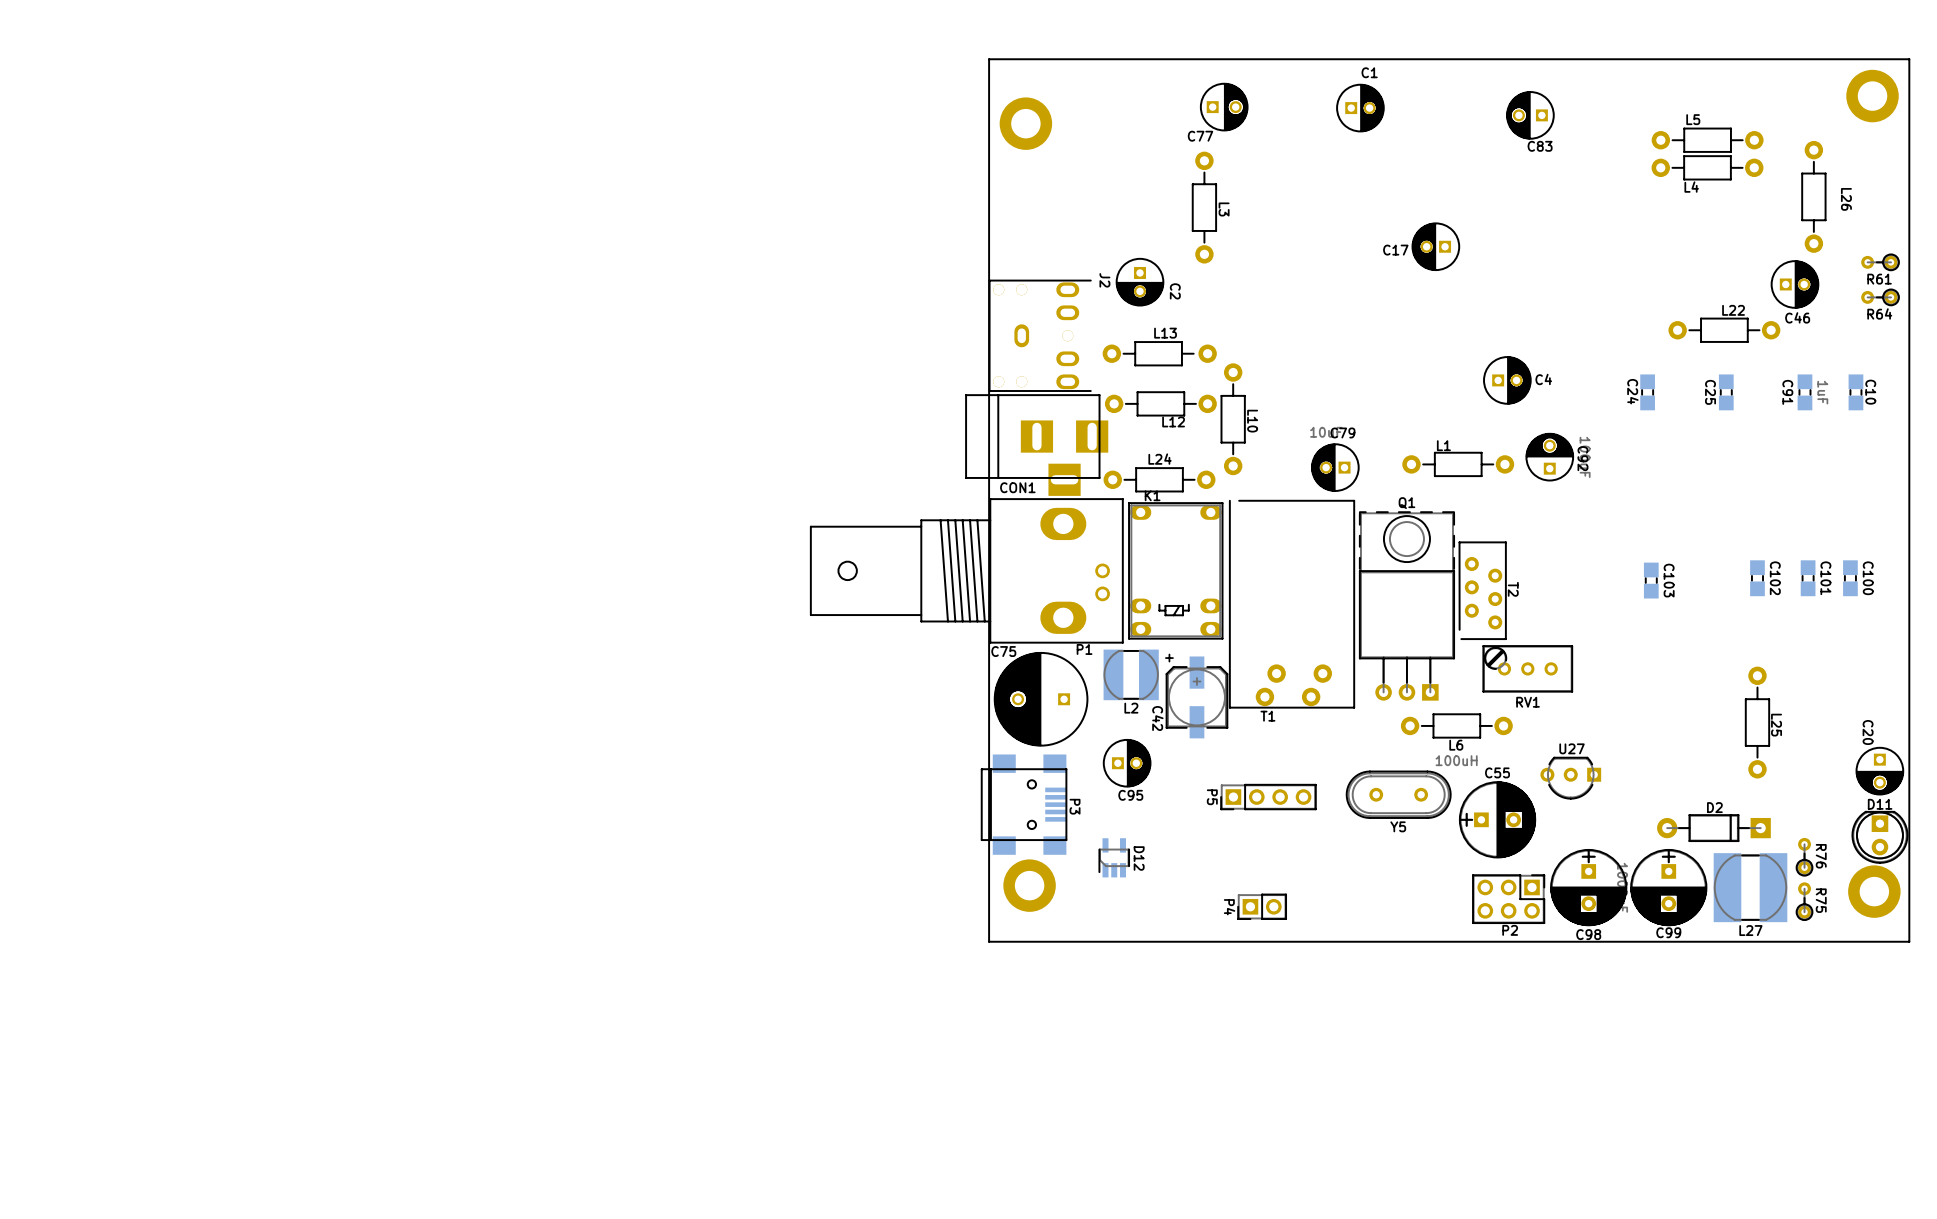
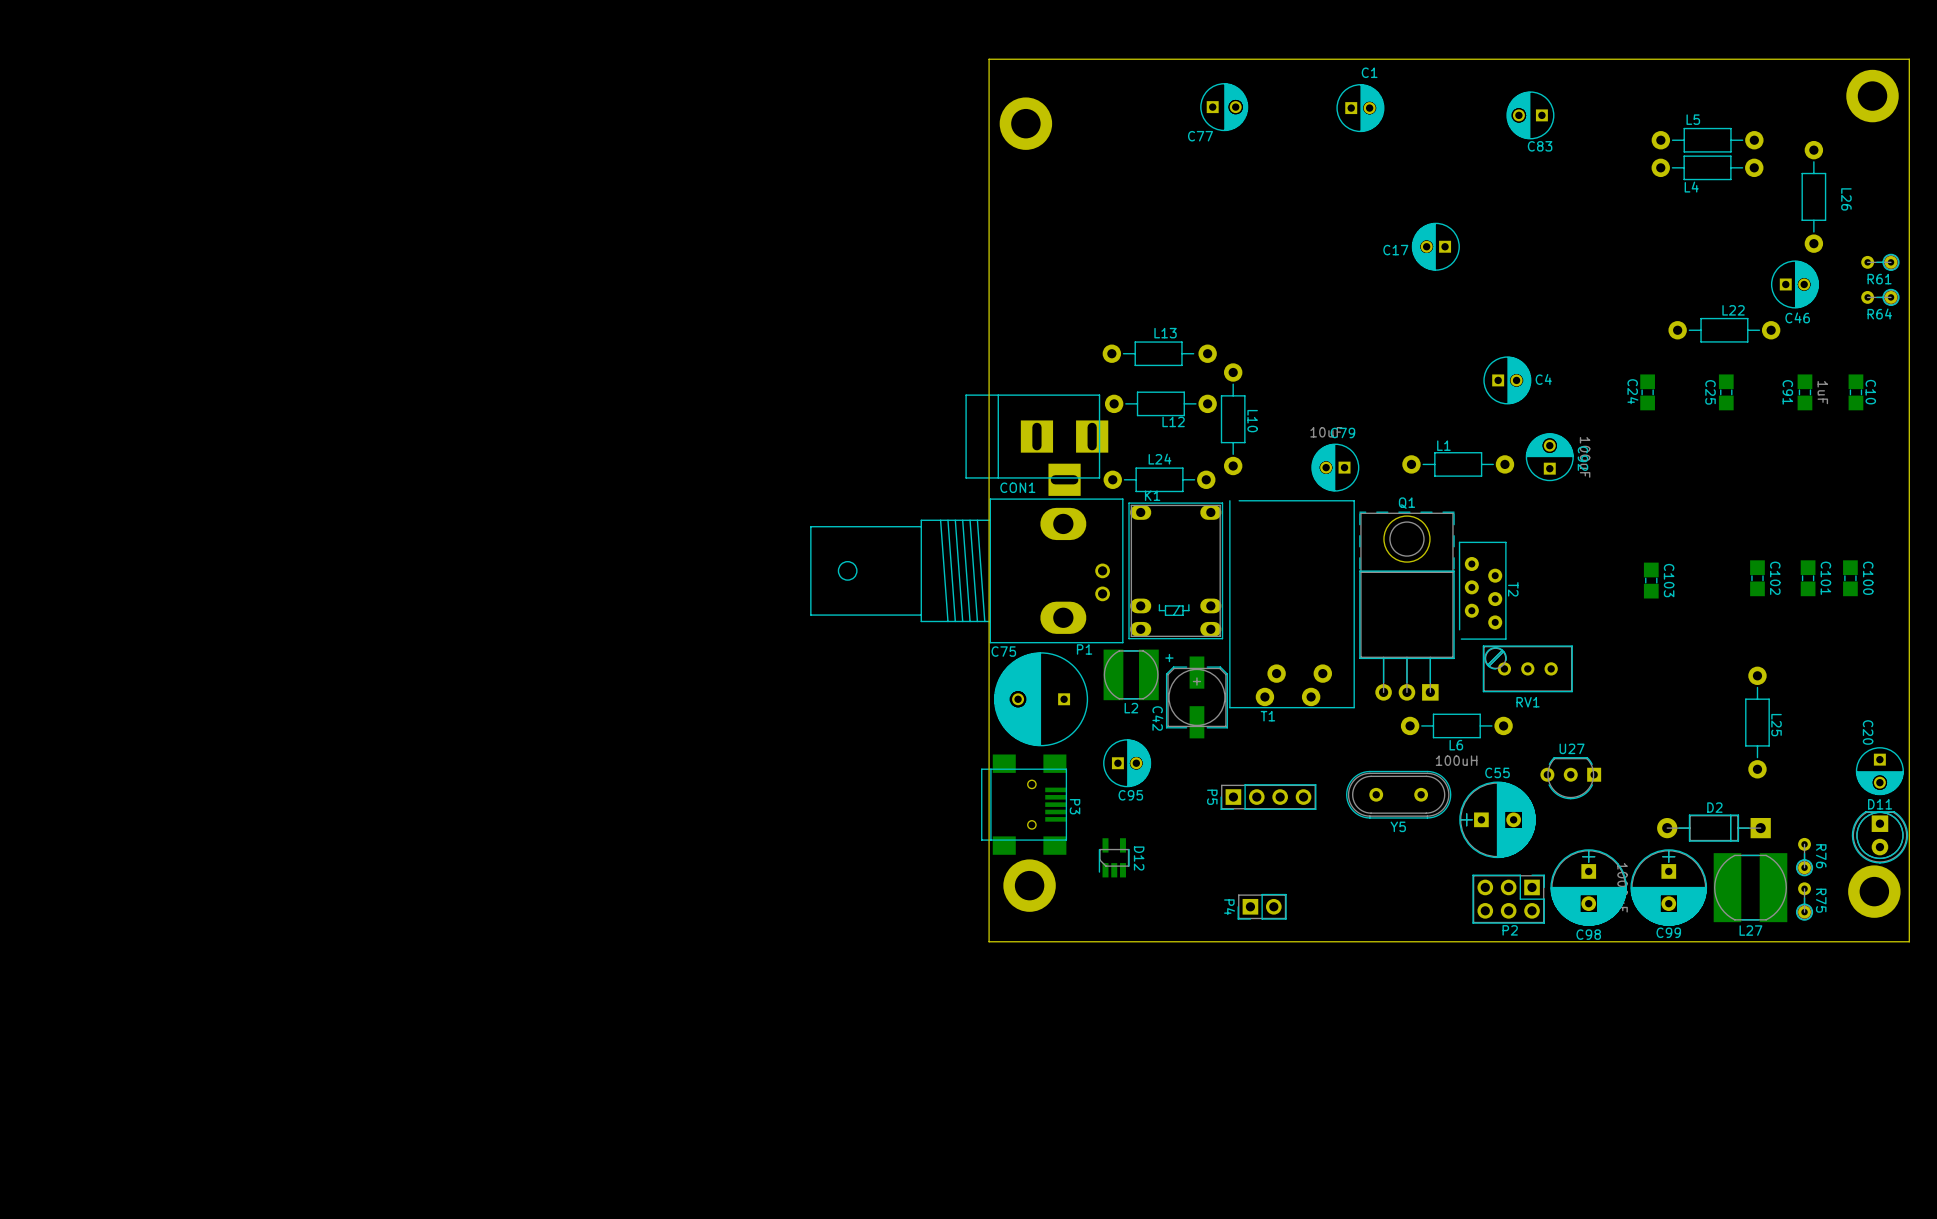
L3: (1204, 207) -> none
C2: (1140, 282) -> none
J2: (1040, 335) -> none

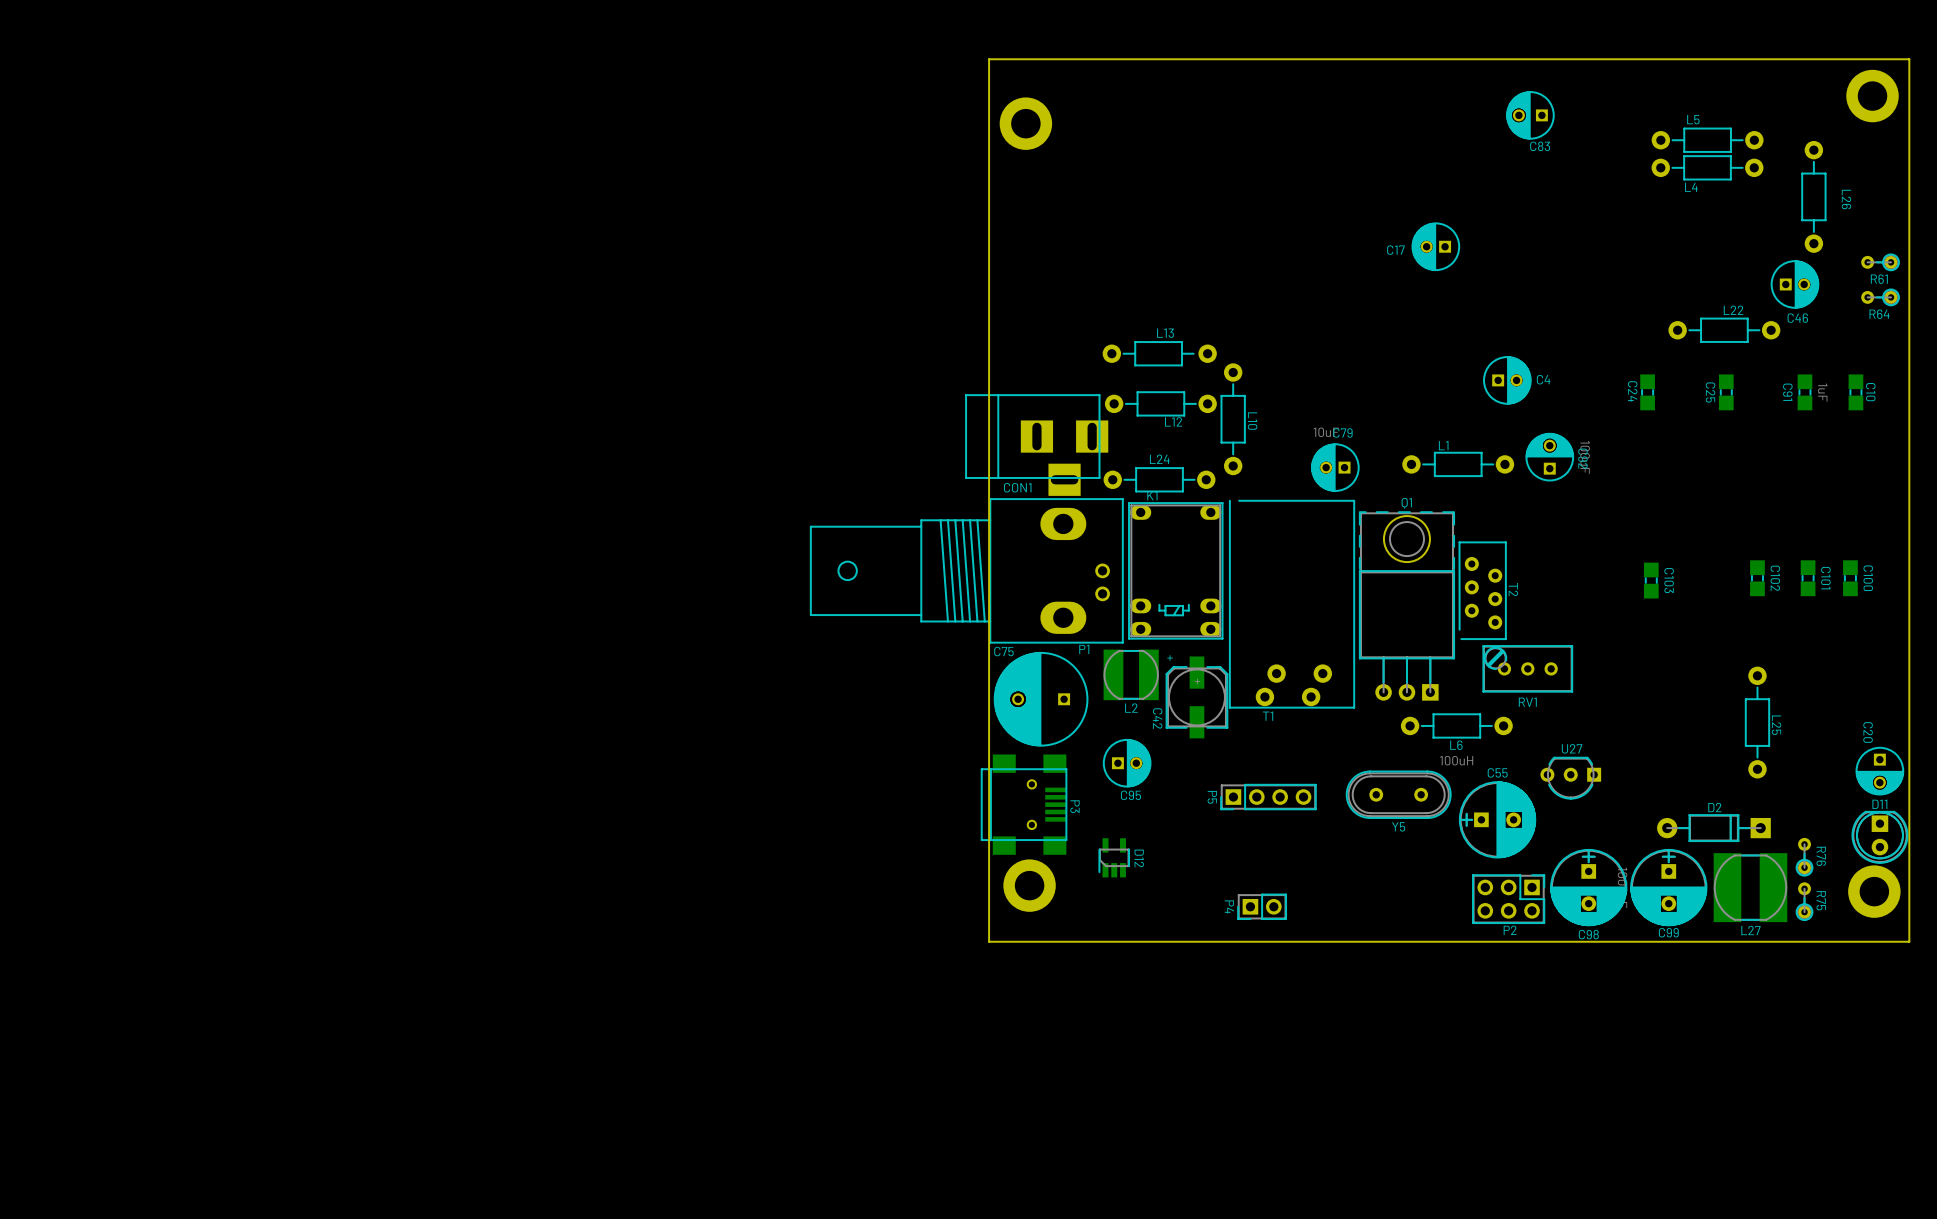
C77: (1224, 107) -> none
C1: (1360, 108) -> none

